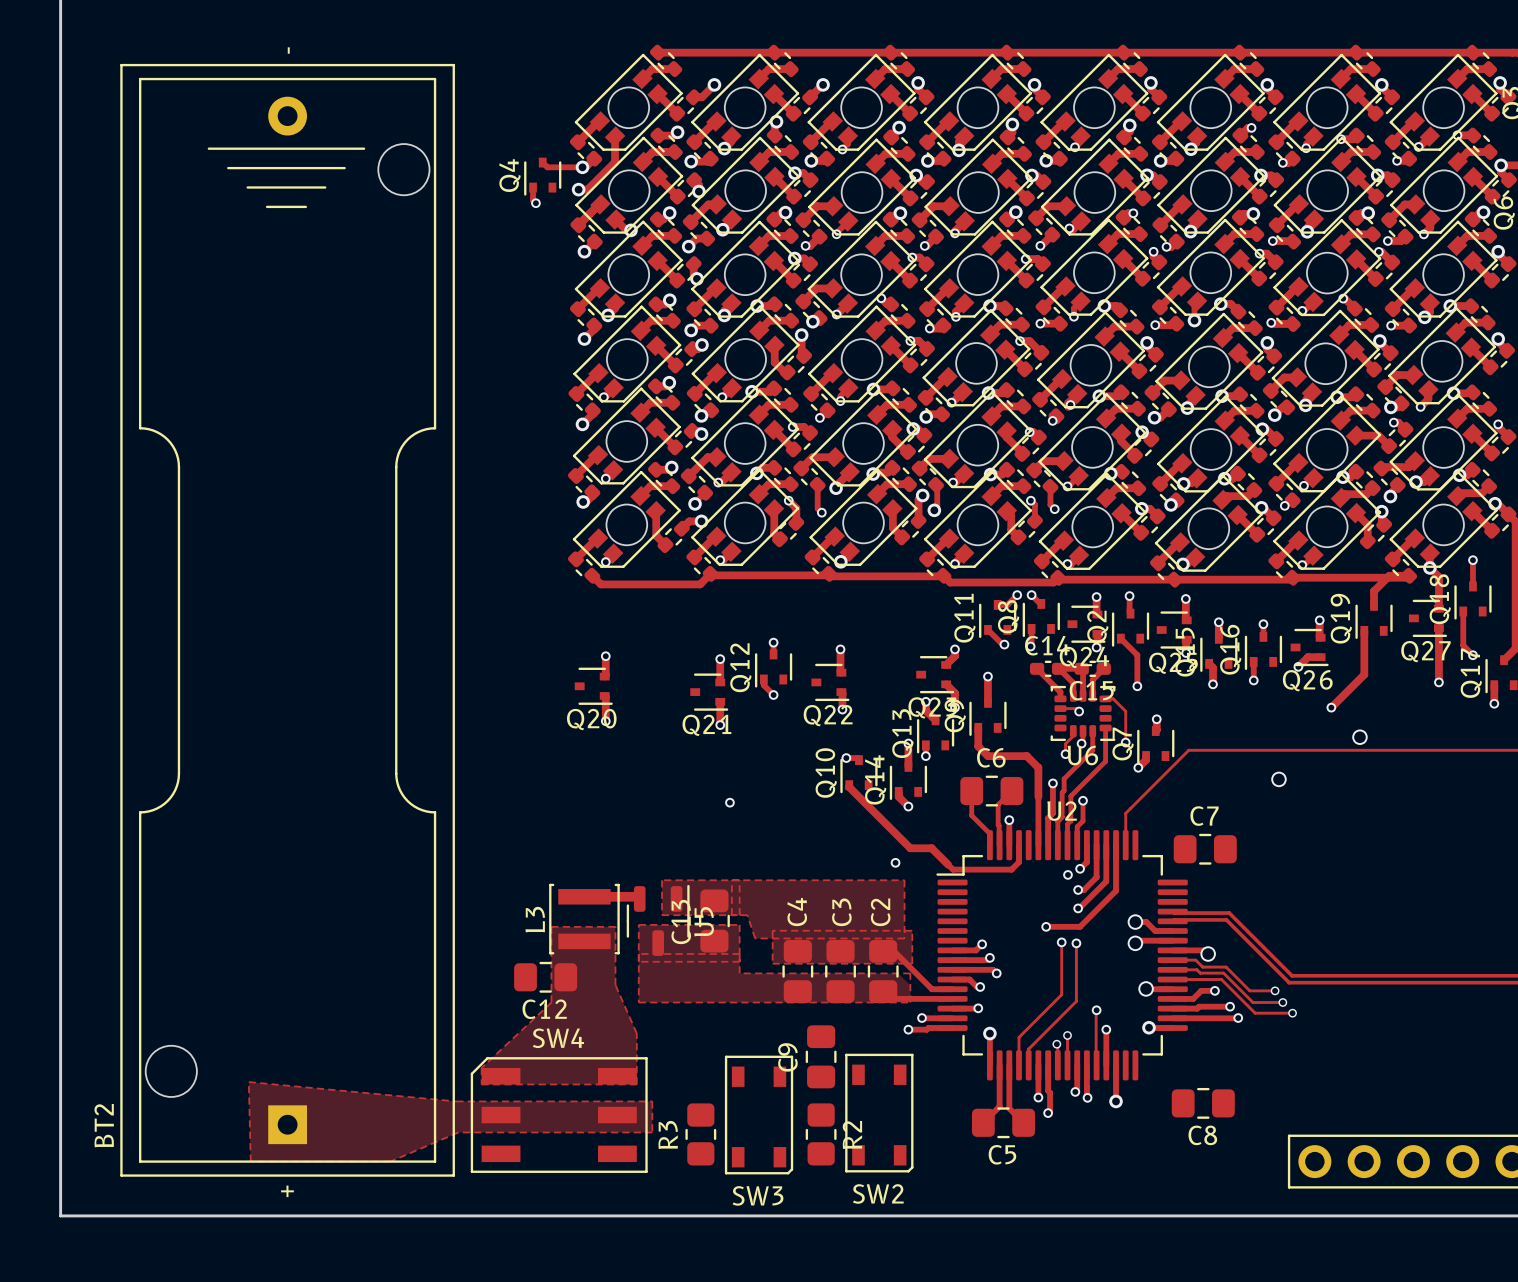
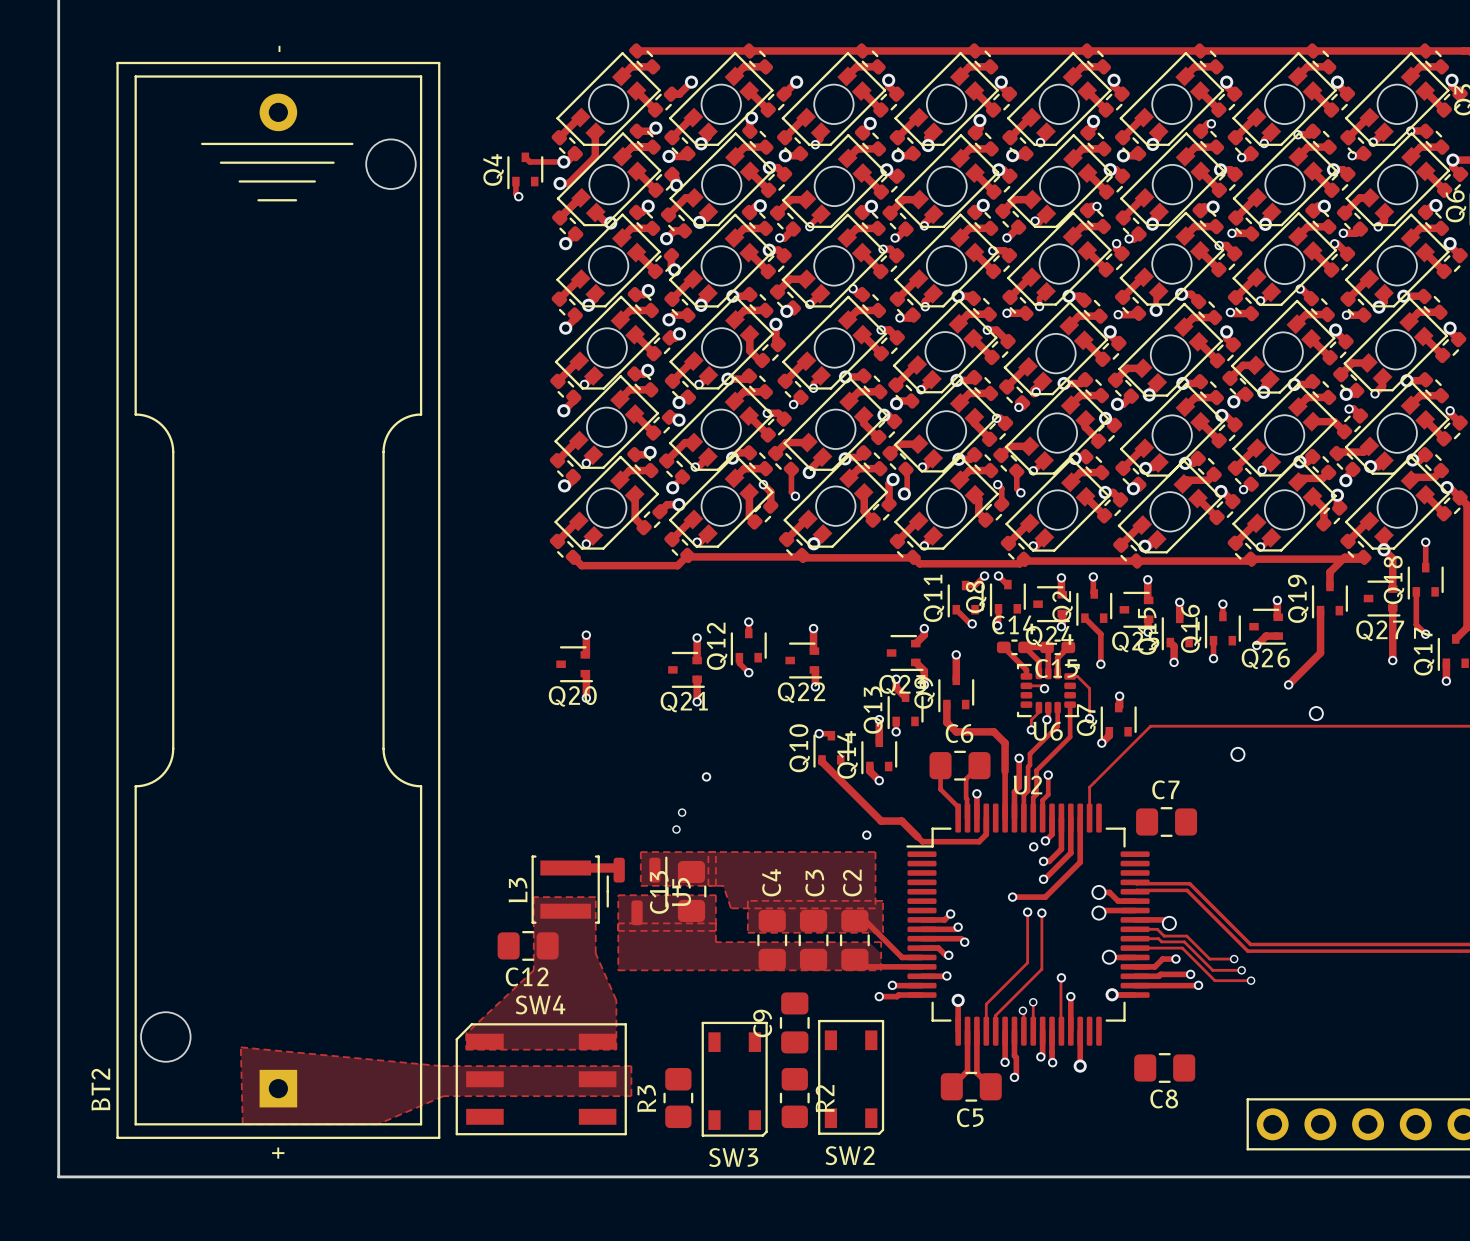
via: none -> (682, 812)
via: none -> (676, 829)

